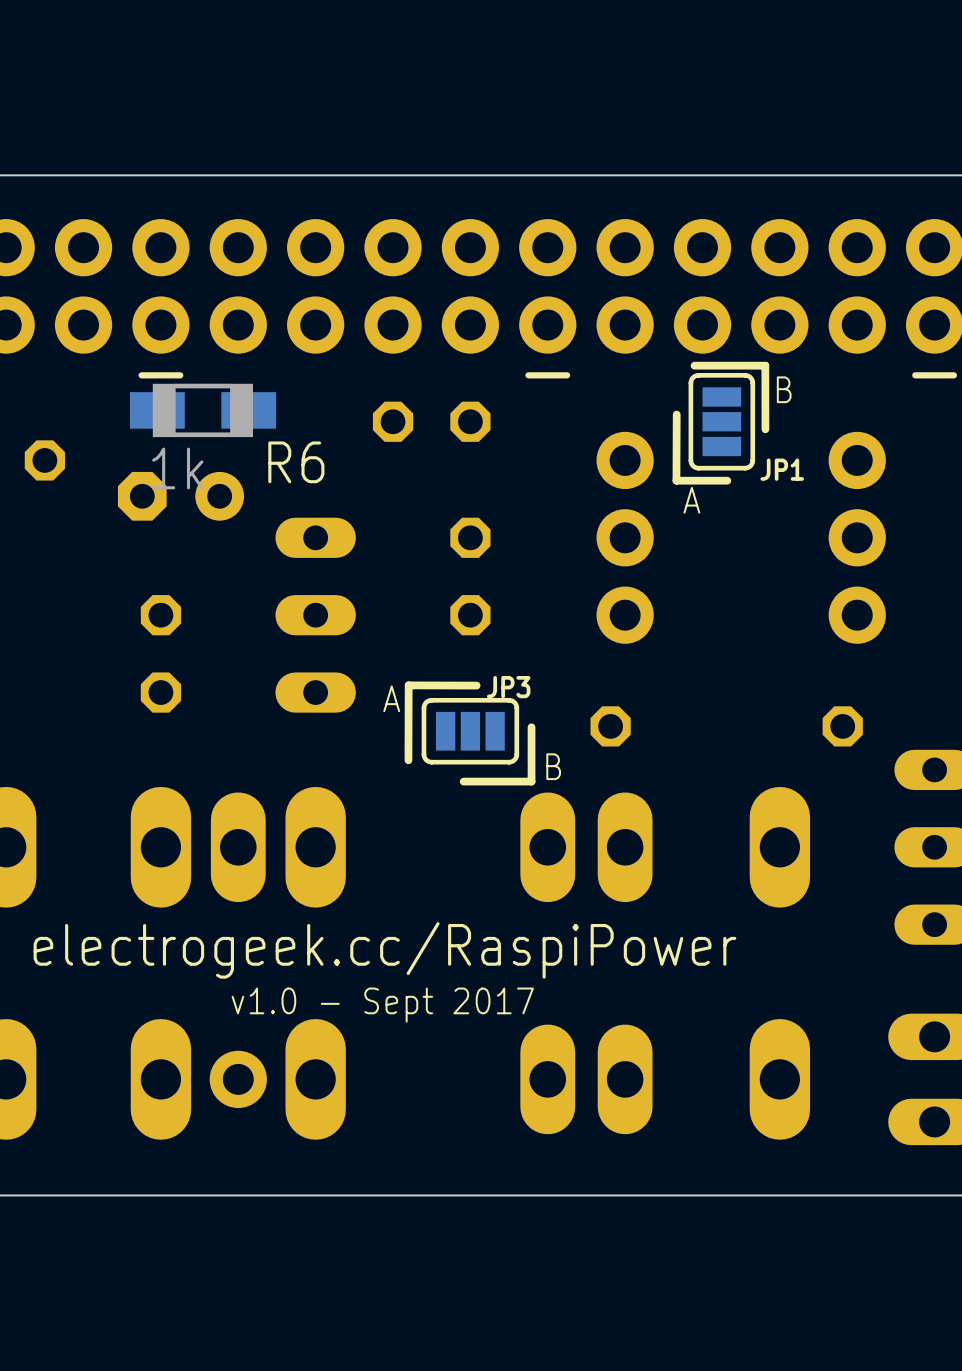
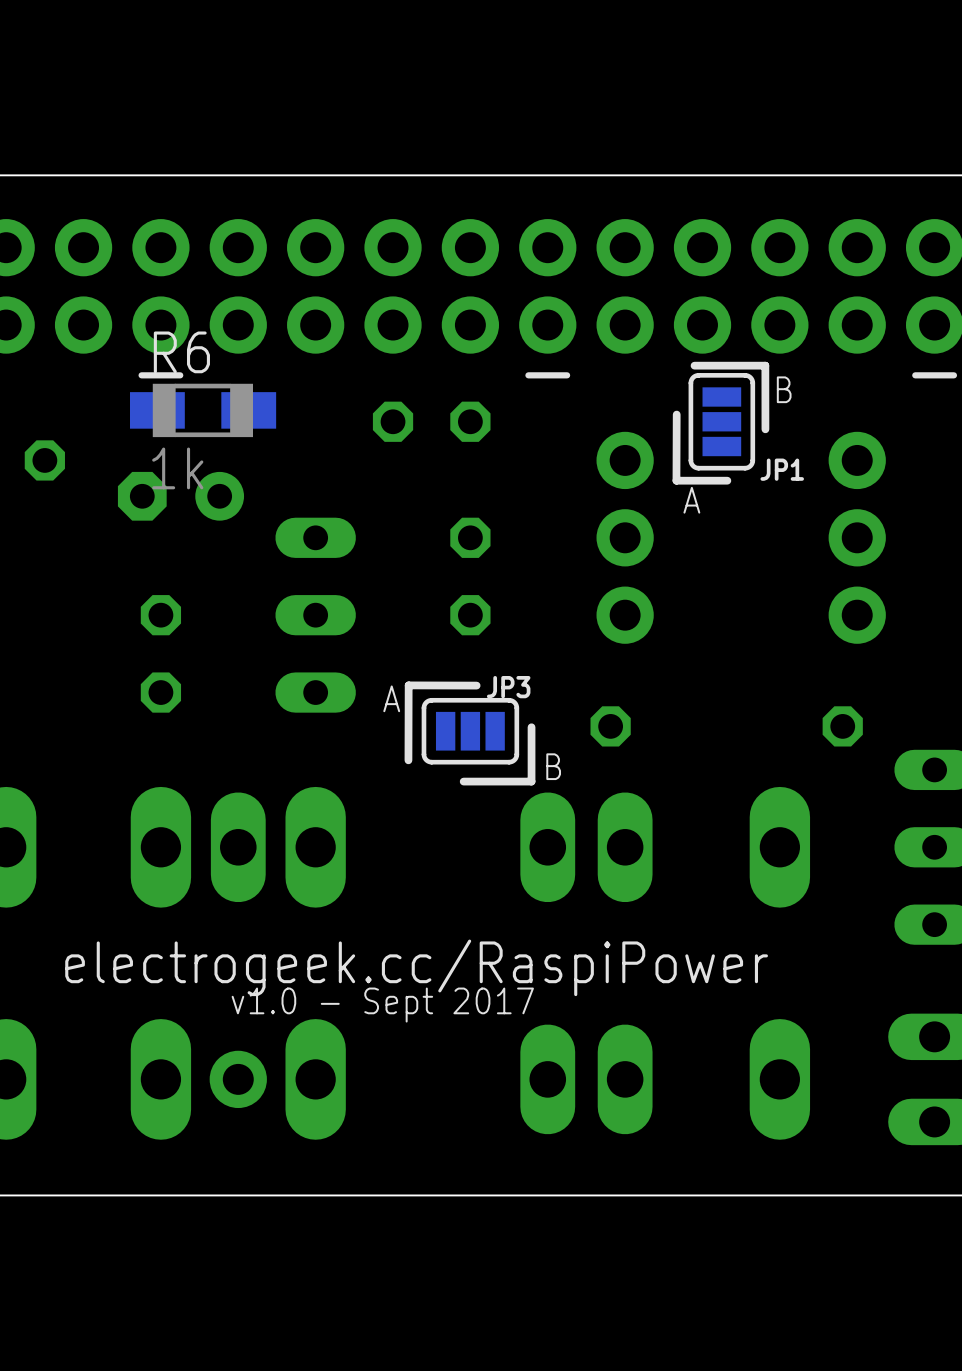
R6 name position: R6 (296, 462) -> R6 (181, 352)
text position: electrogeek.cc/RaspiPower (384, 950) -> electrogeek.cc/RaspiPower (416, 967)

